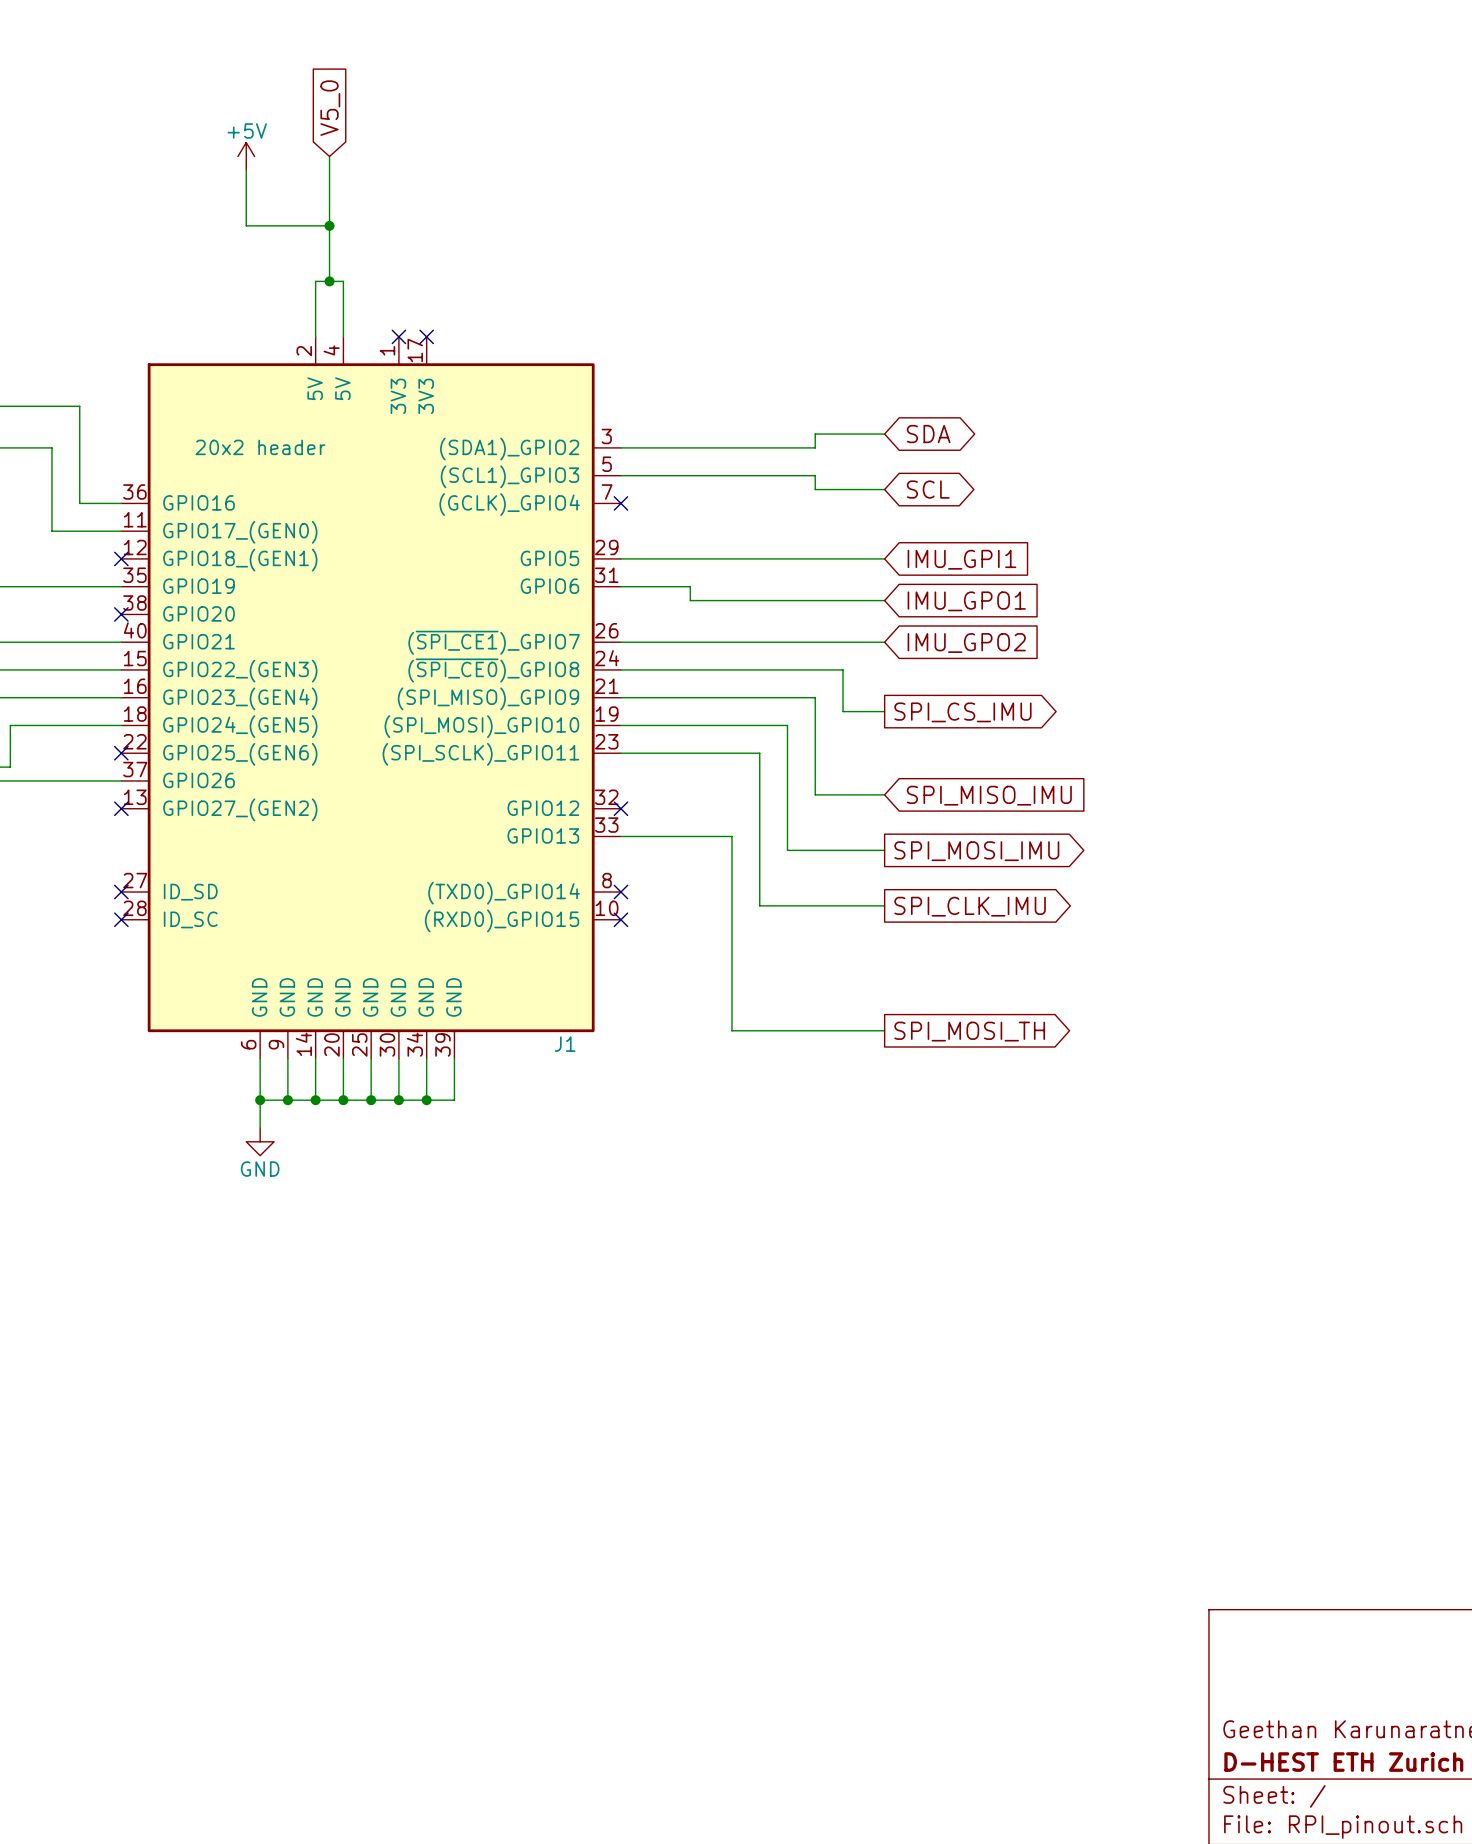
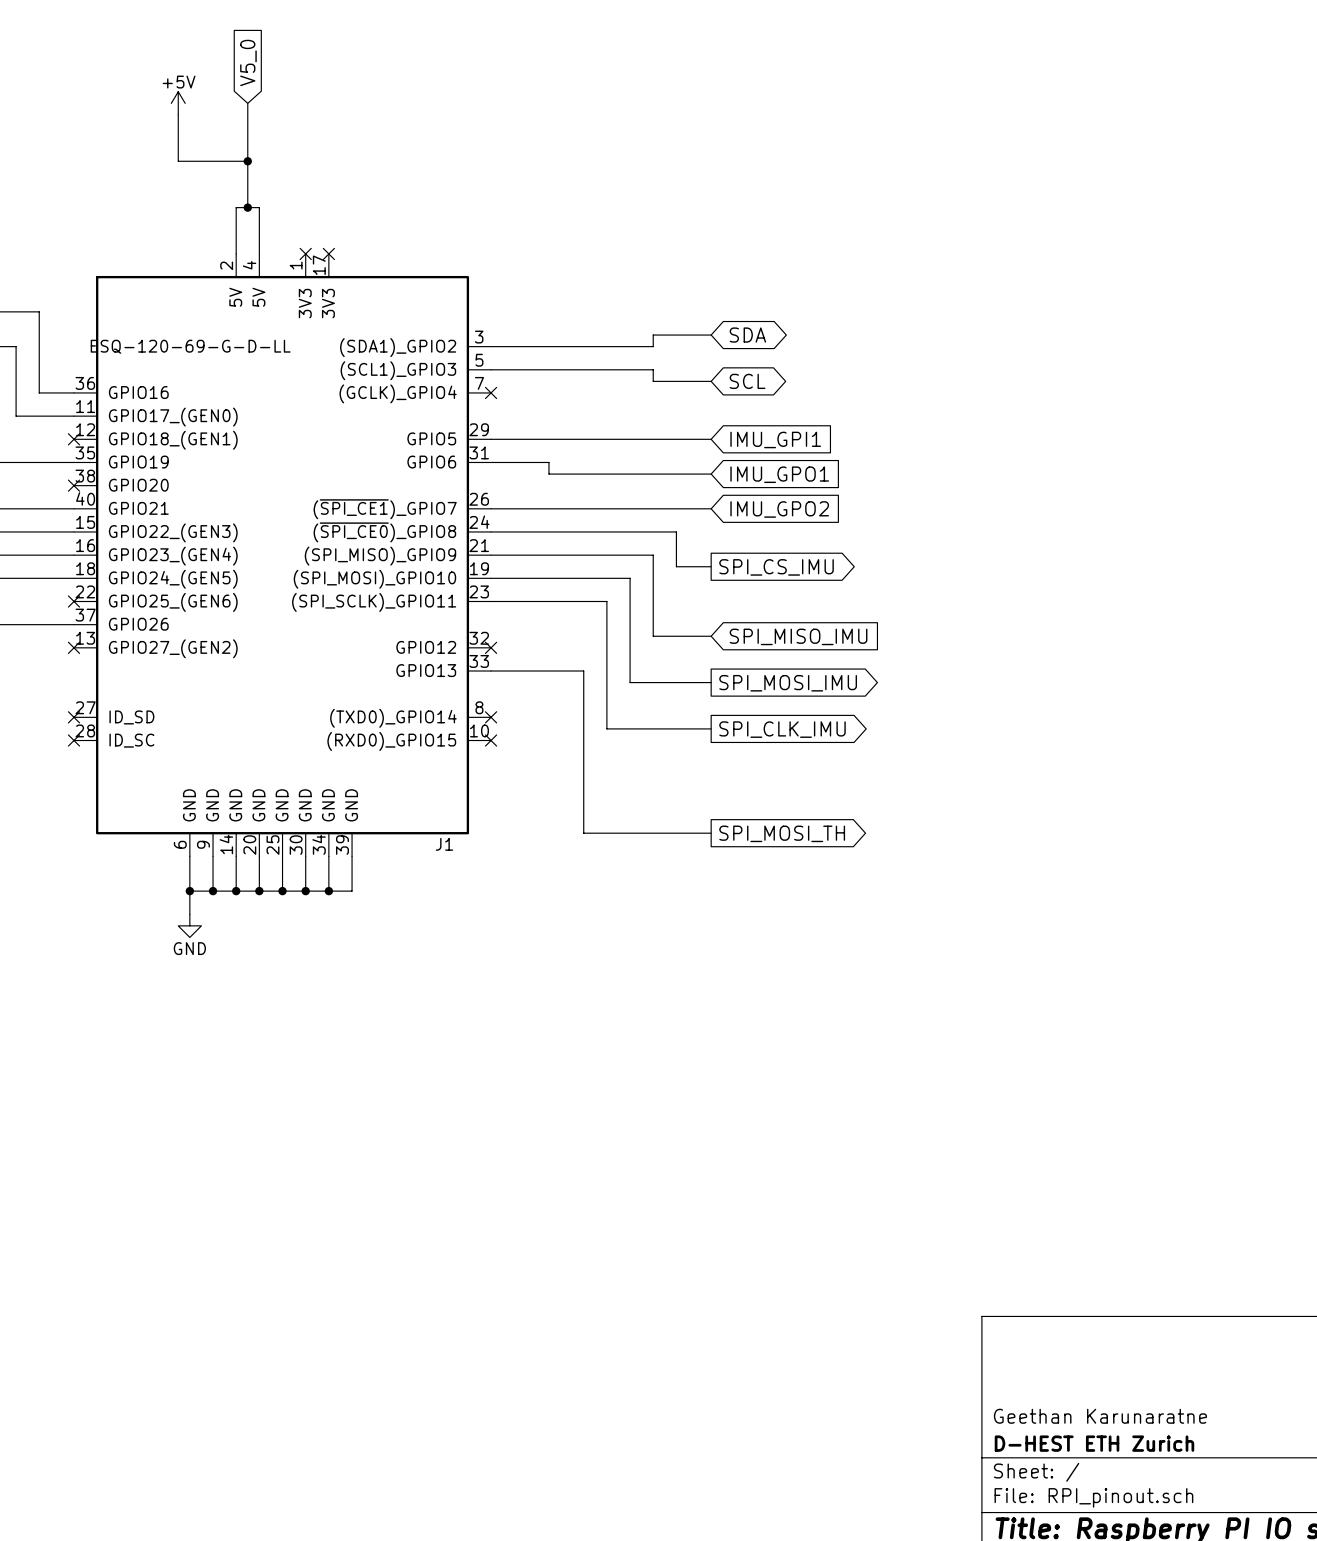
J1 value: 20x2 header (260, 447) -> ESQ-120-69-G-D-LL (190, 346)

